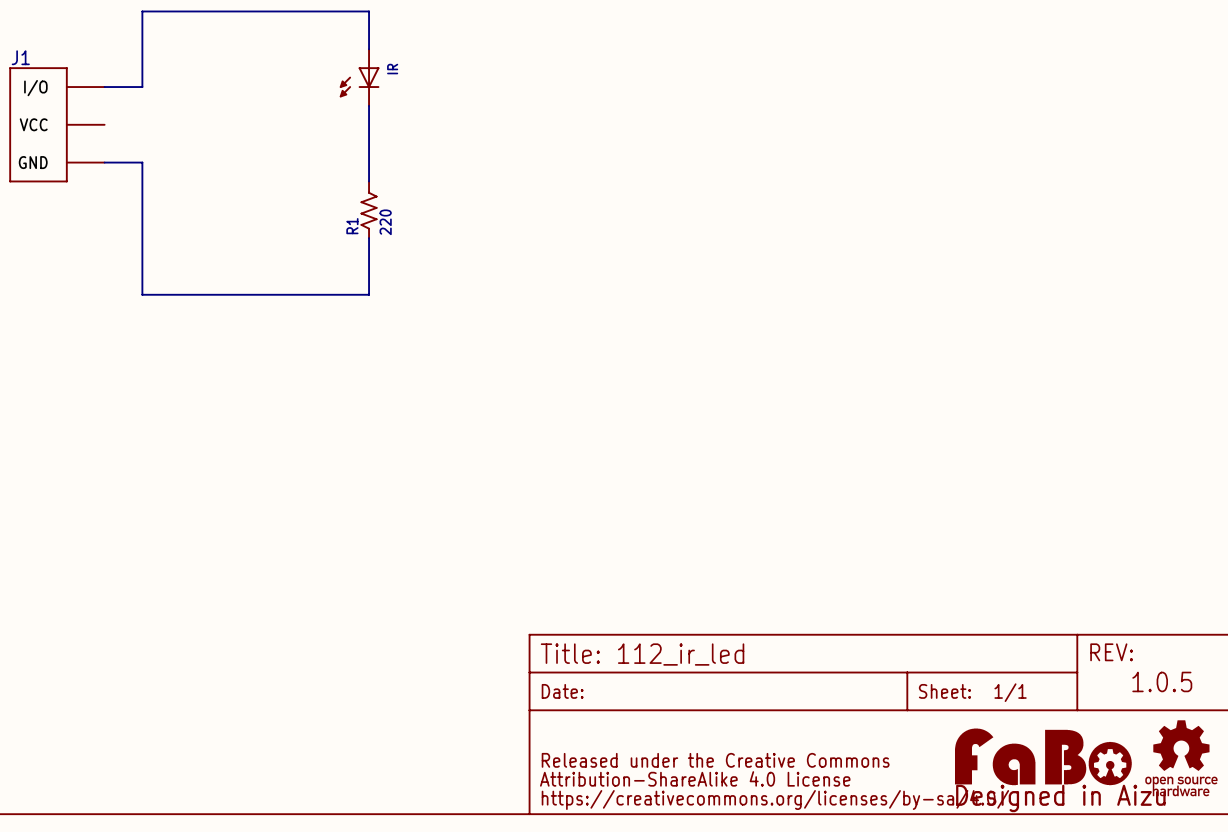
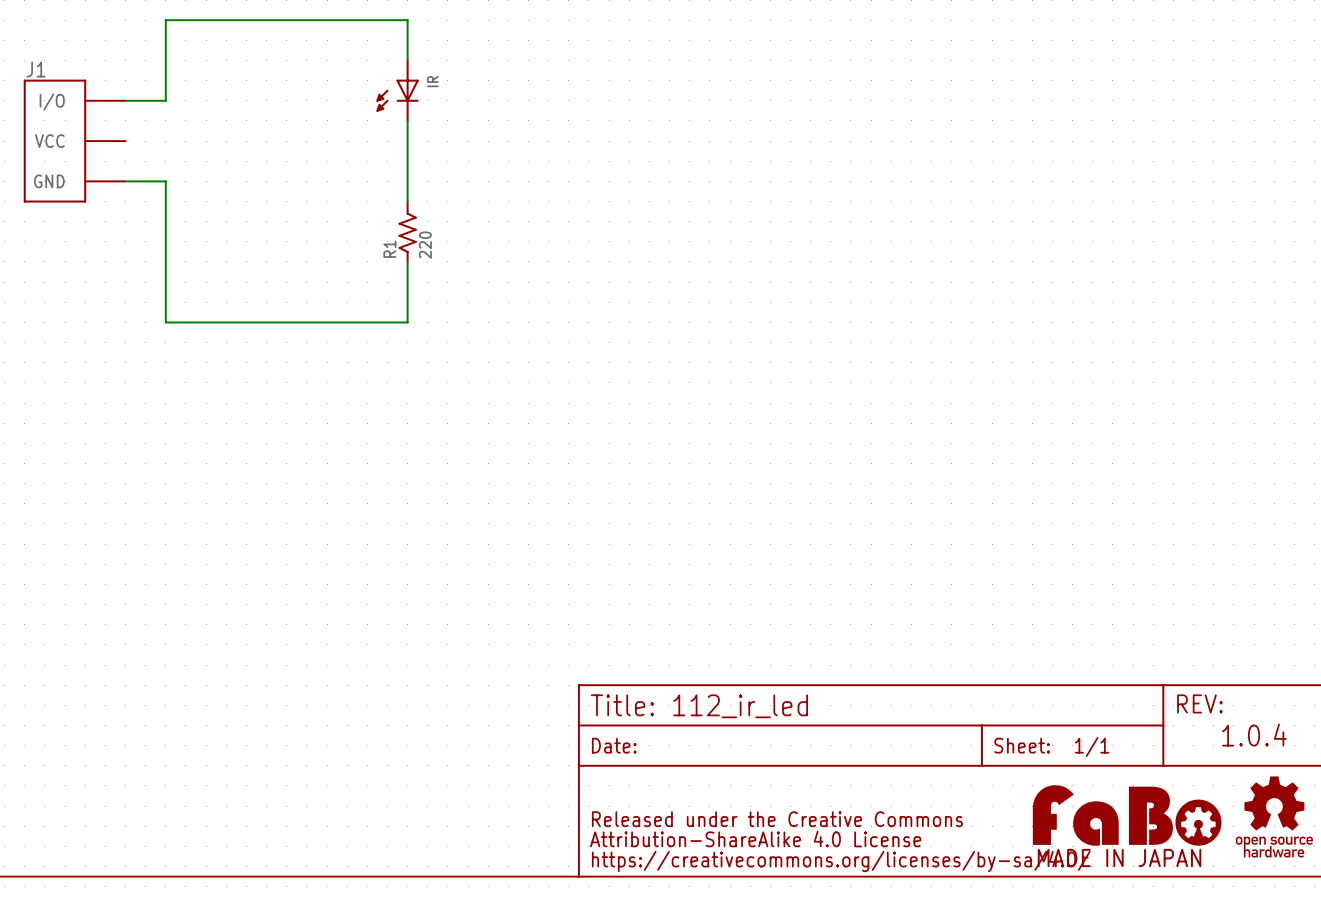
text: 1.0.5 (1162, 681) -> 1.0.4 (1254, 735)
part text: none -> MADE IN JAPAN (1119, 857)
part text: Designed in Aizu (1060, 798) -> none

